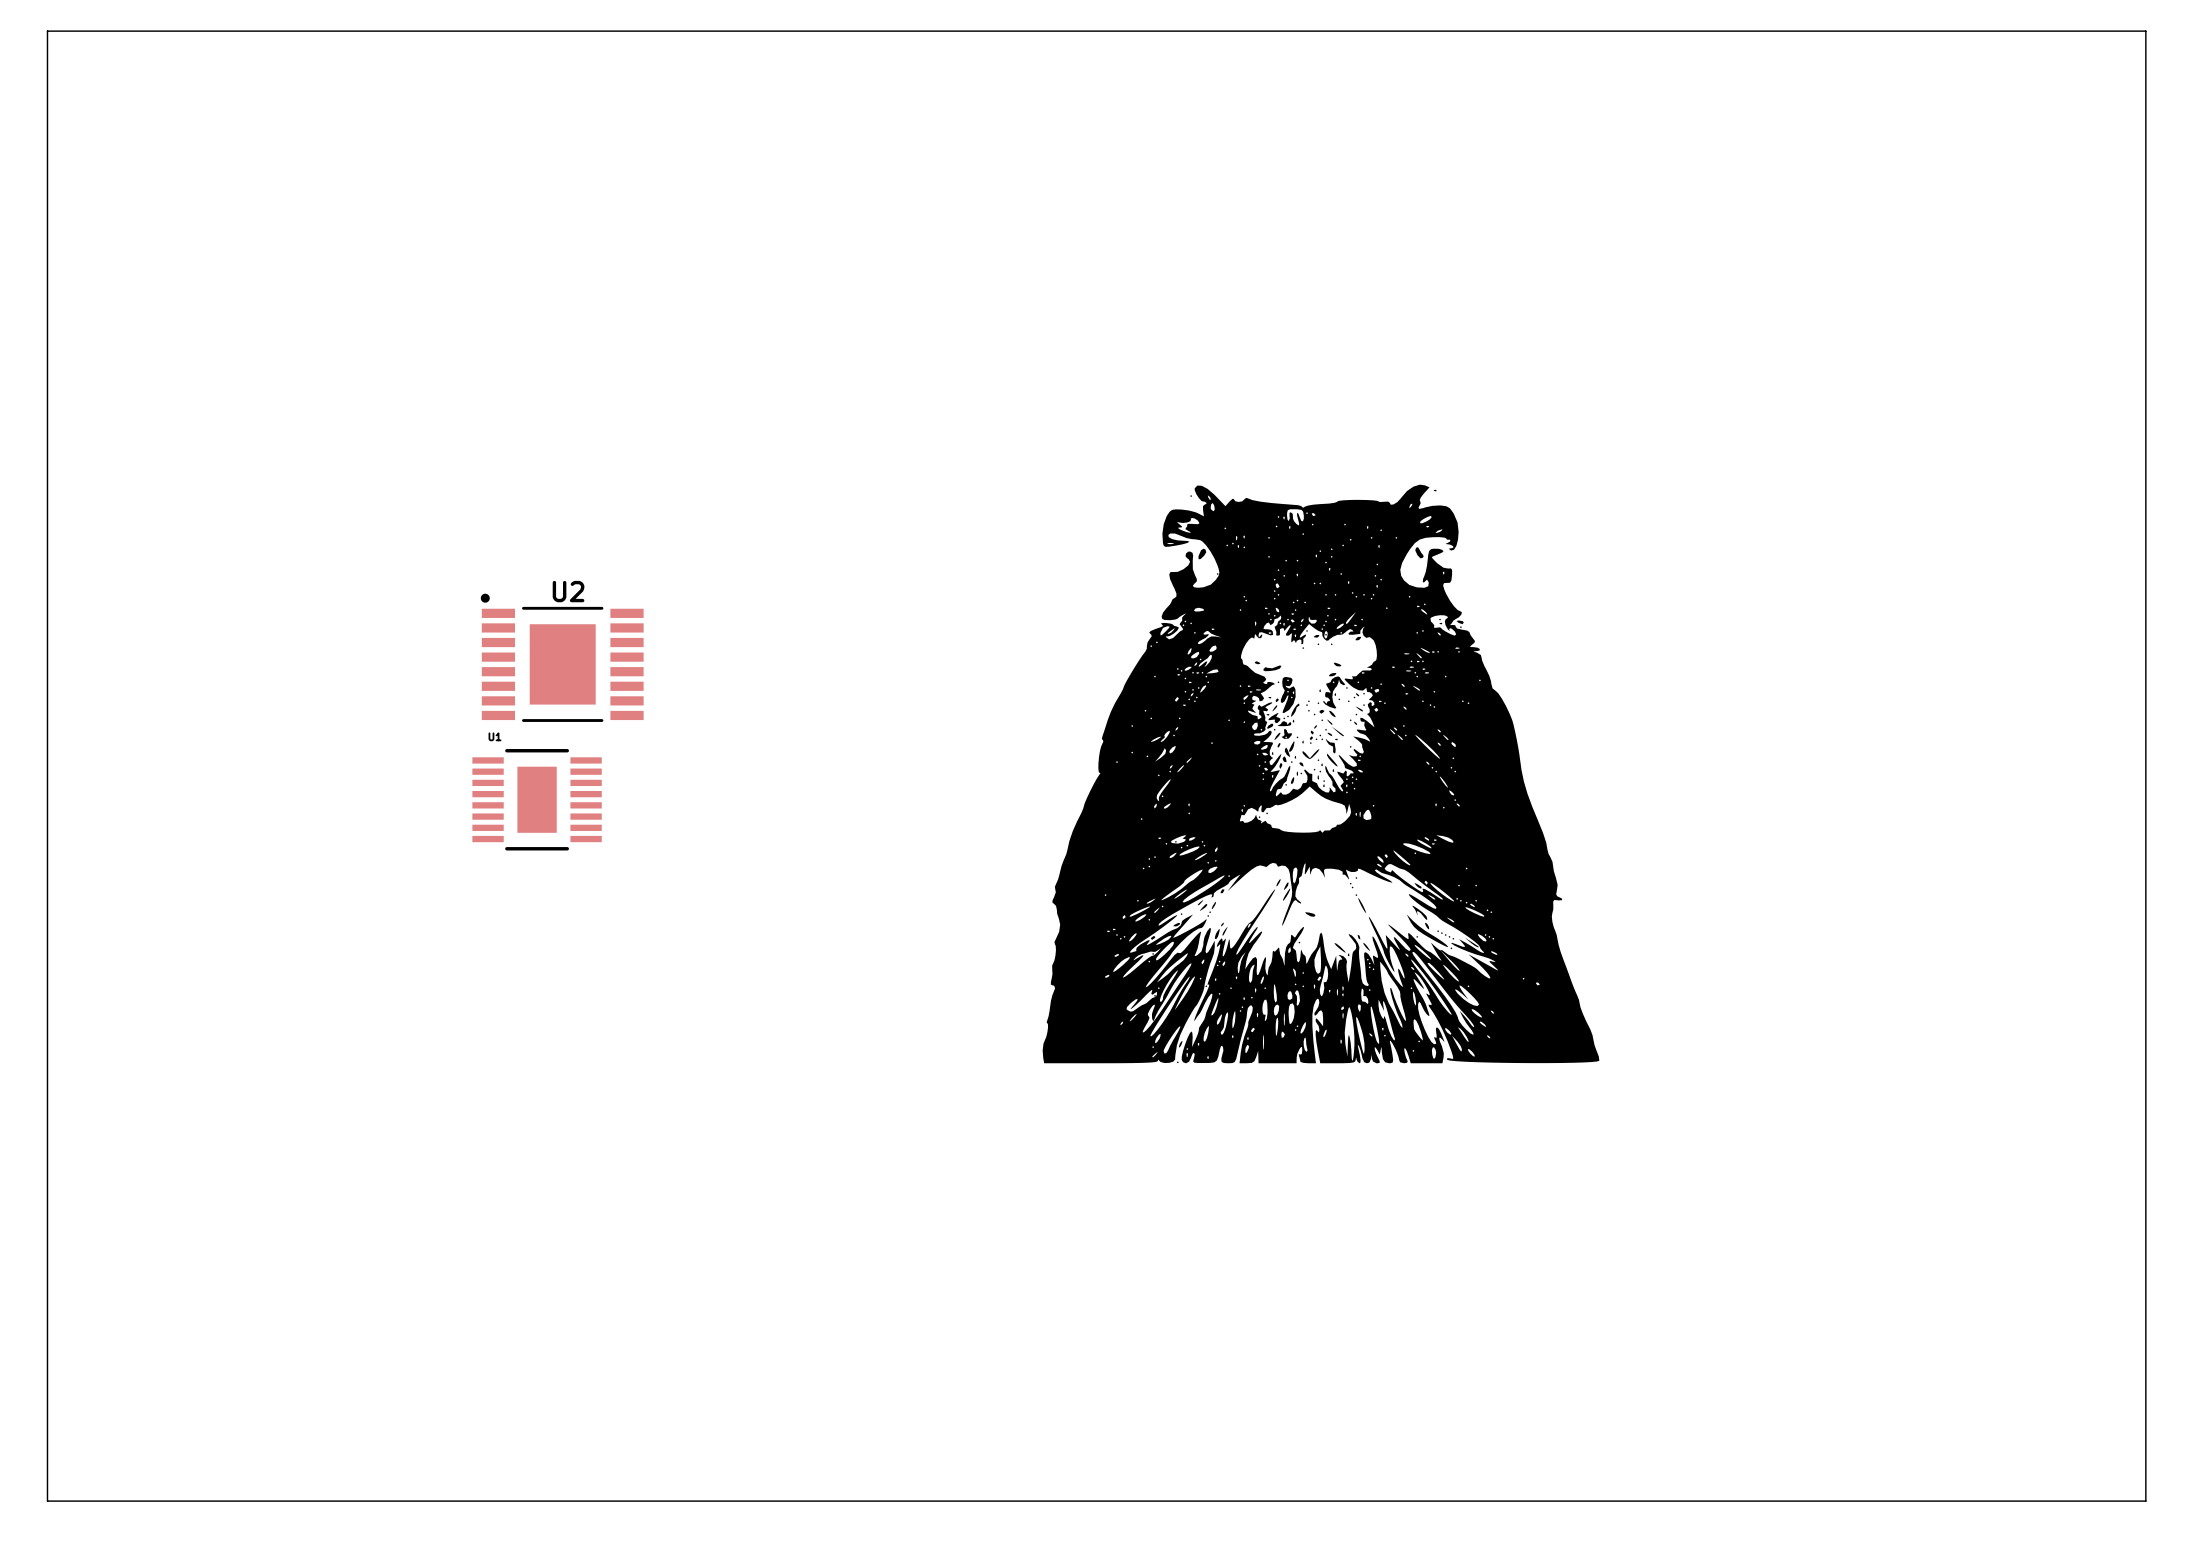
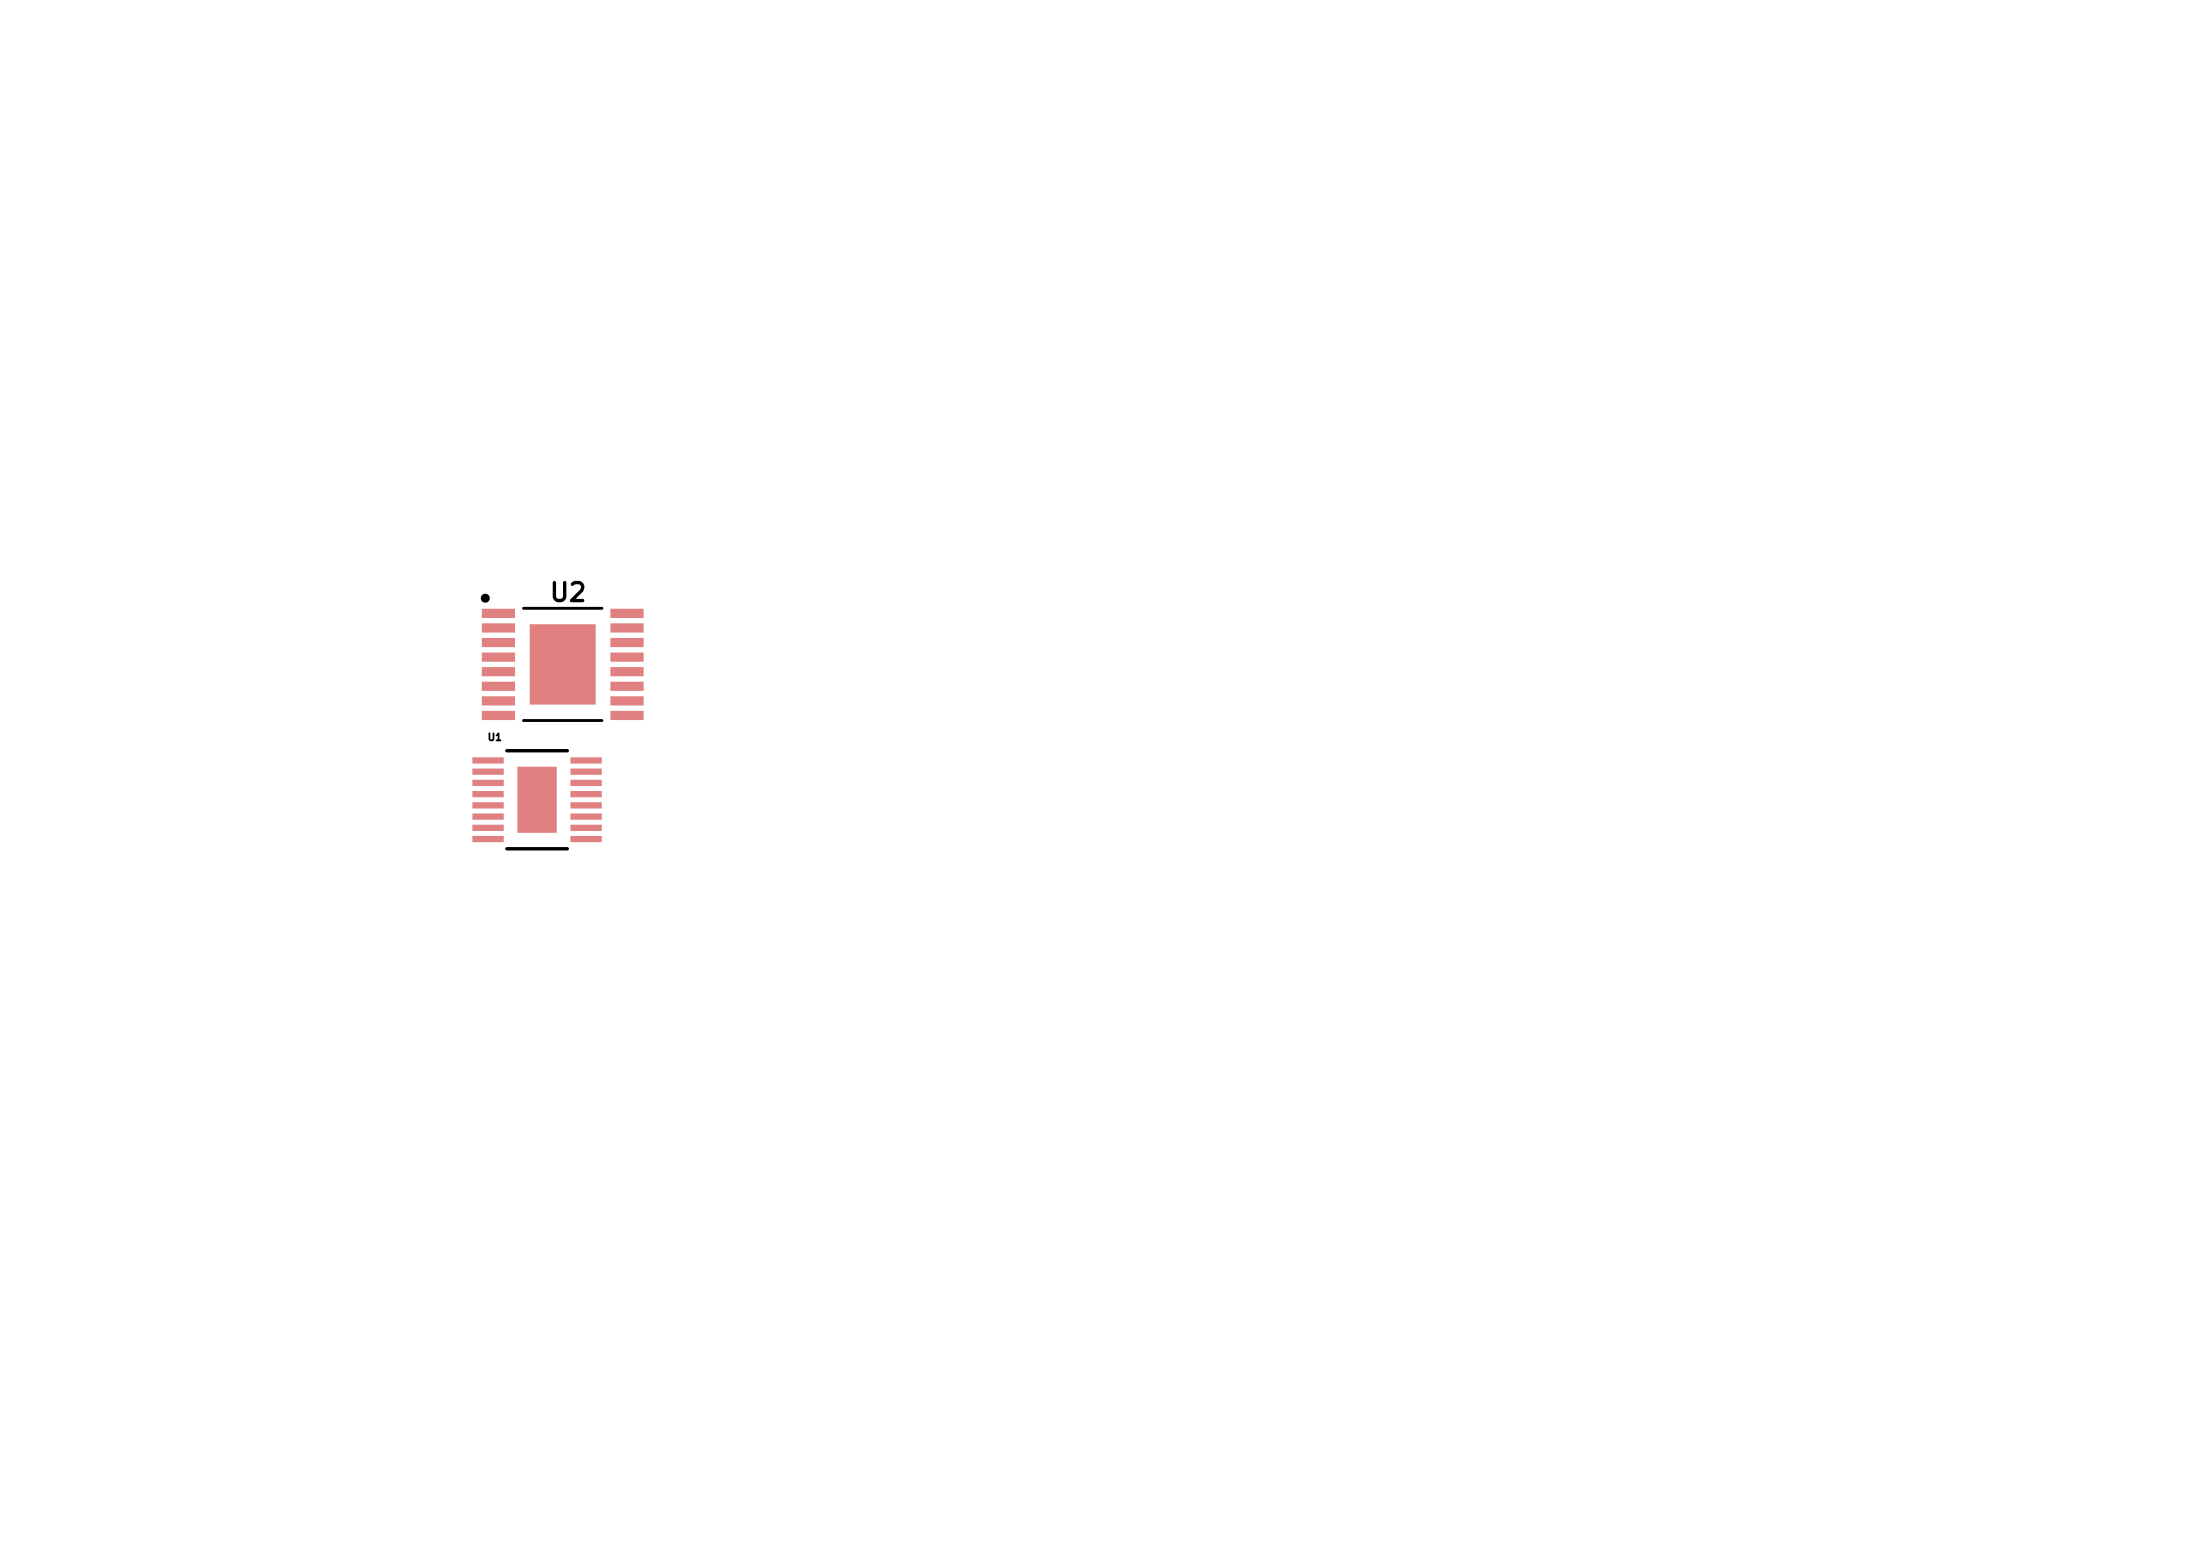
board edge: (47, 31) (2145, 31) (2145, 1501) (47, 1501) (47, 31) -> none
drawing: [1042, 484, 1600, 1064] -> none

